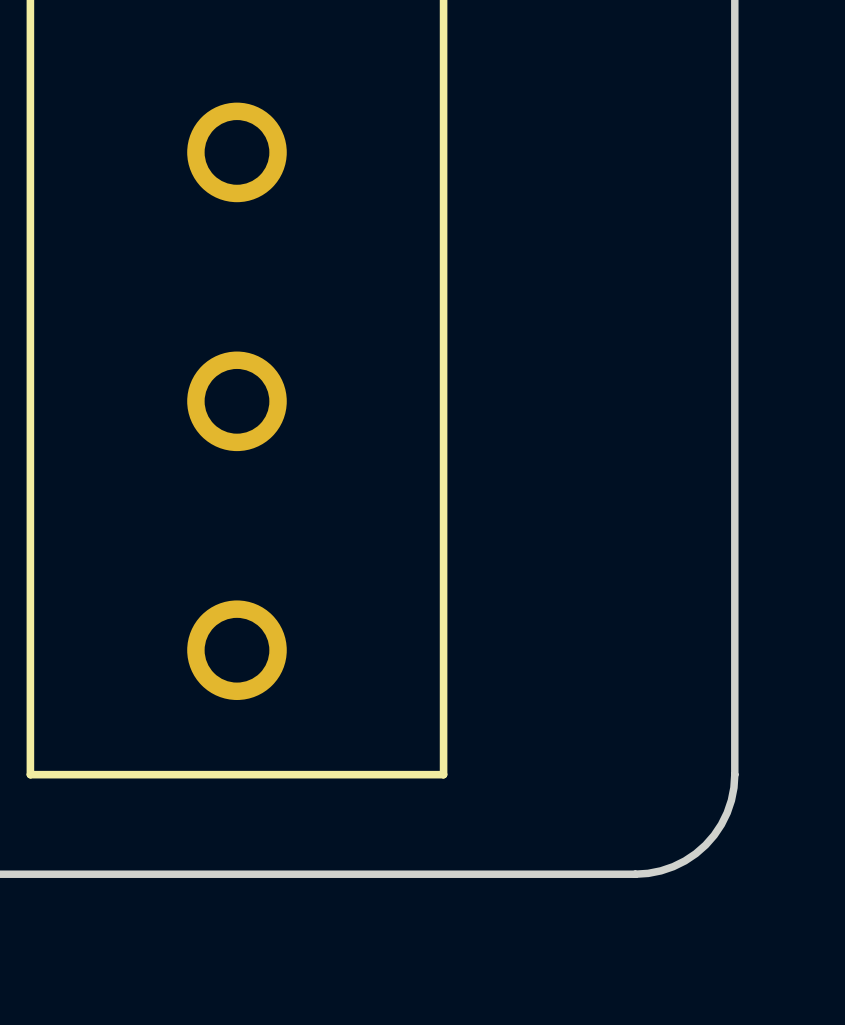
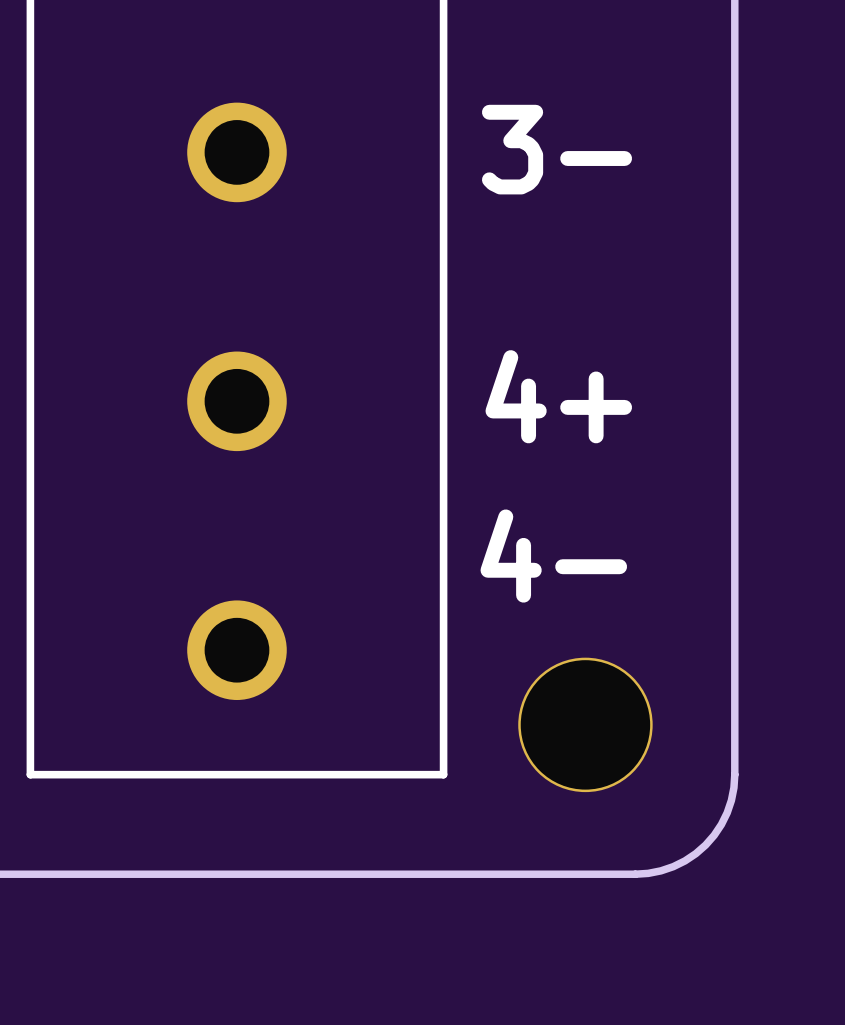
text: none -> 3- (557, 149)
text: none -> 4+ (558, 396)
text: none -> 4- (553, 556)
part: none -> (585, 724)

